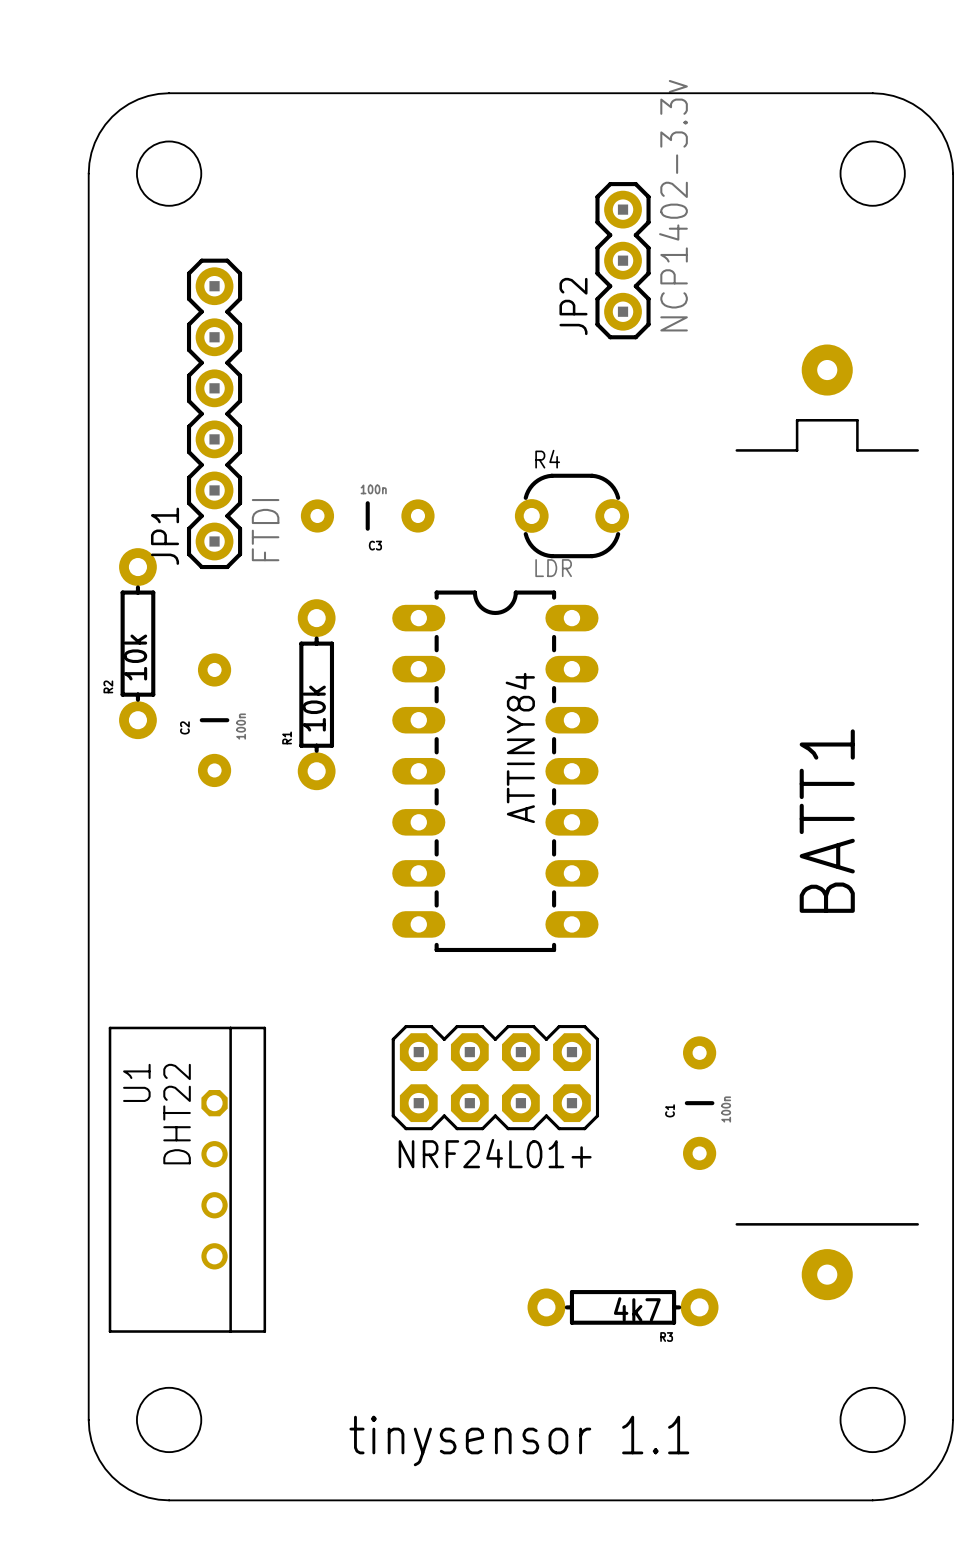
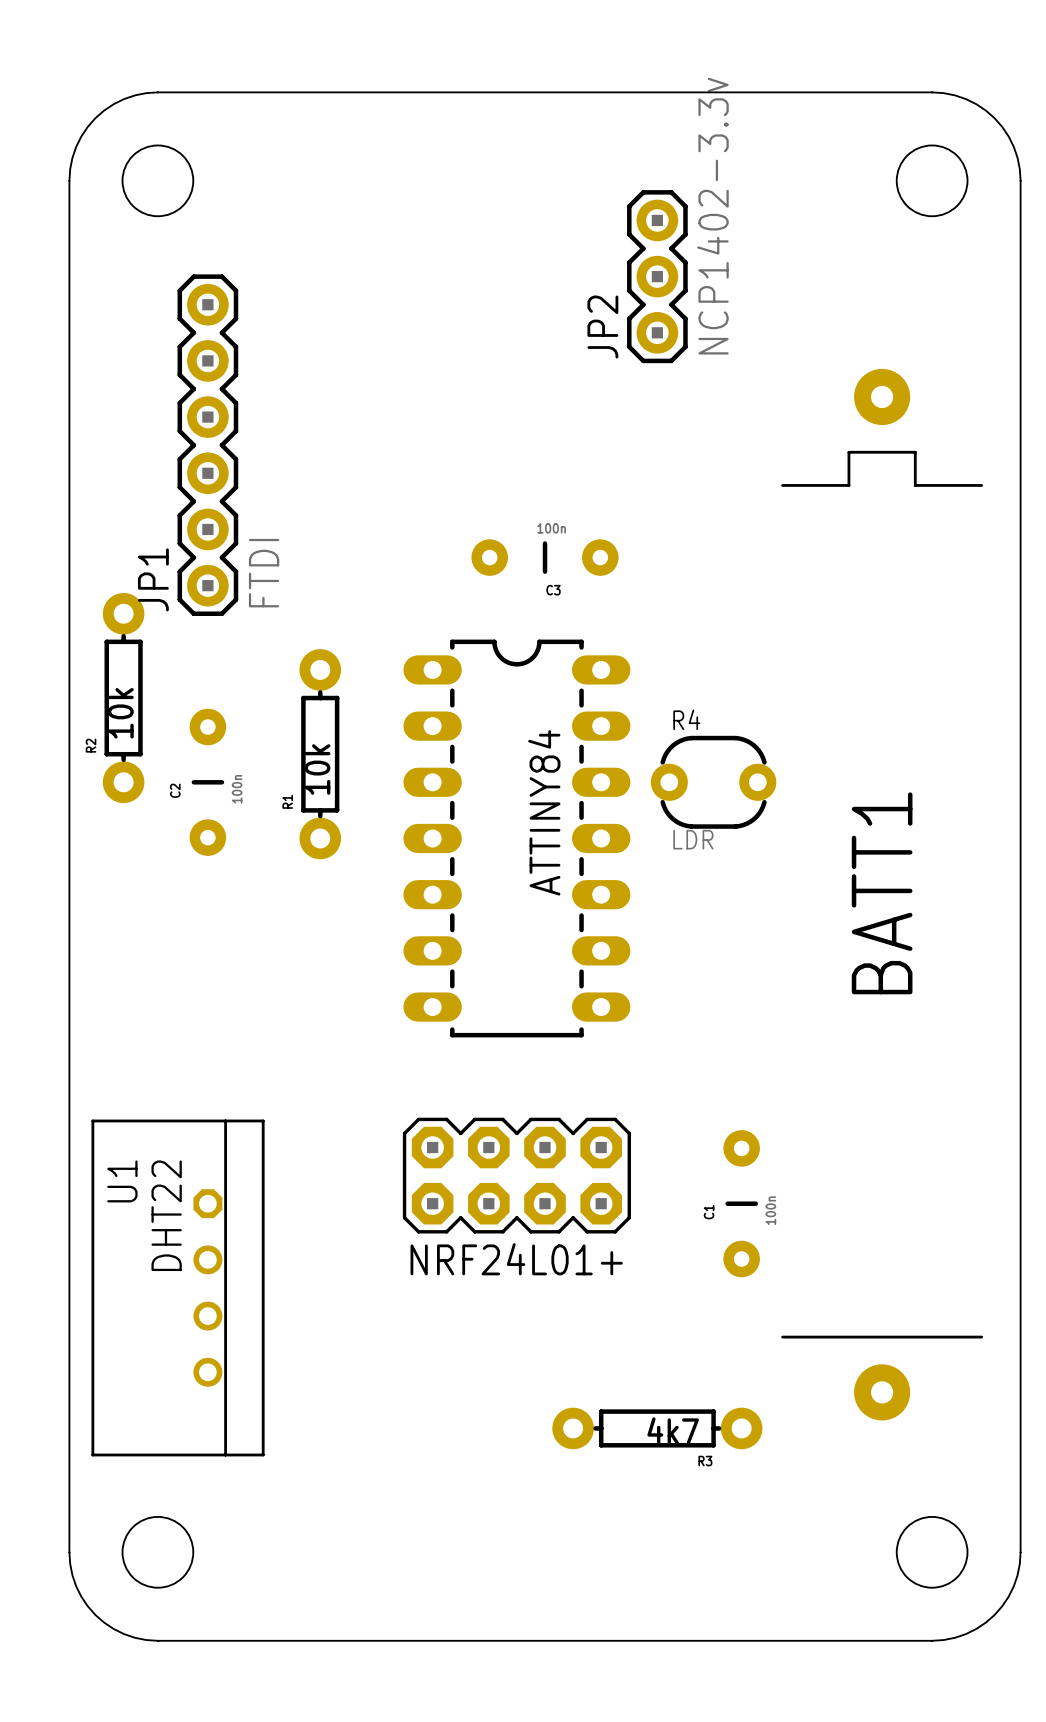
C3 position: (367, 515) -> (545, 557)
R4 position: (571, 515) -> (713, 782)
text: tinysensor 1.1 (519, 1440) -> none

